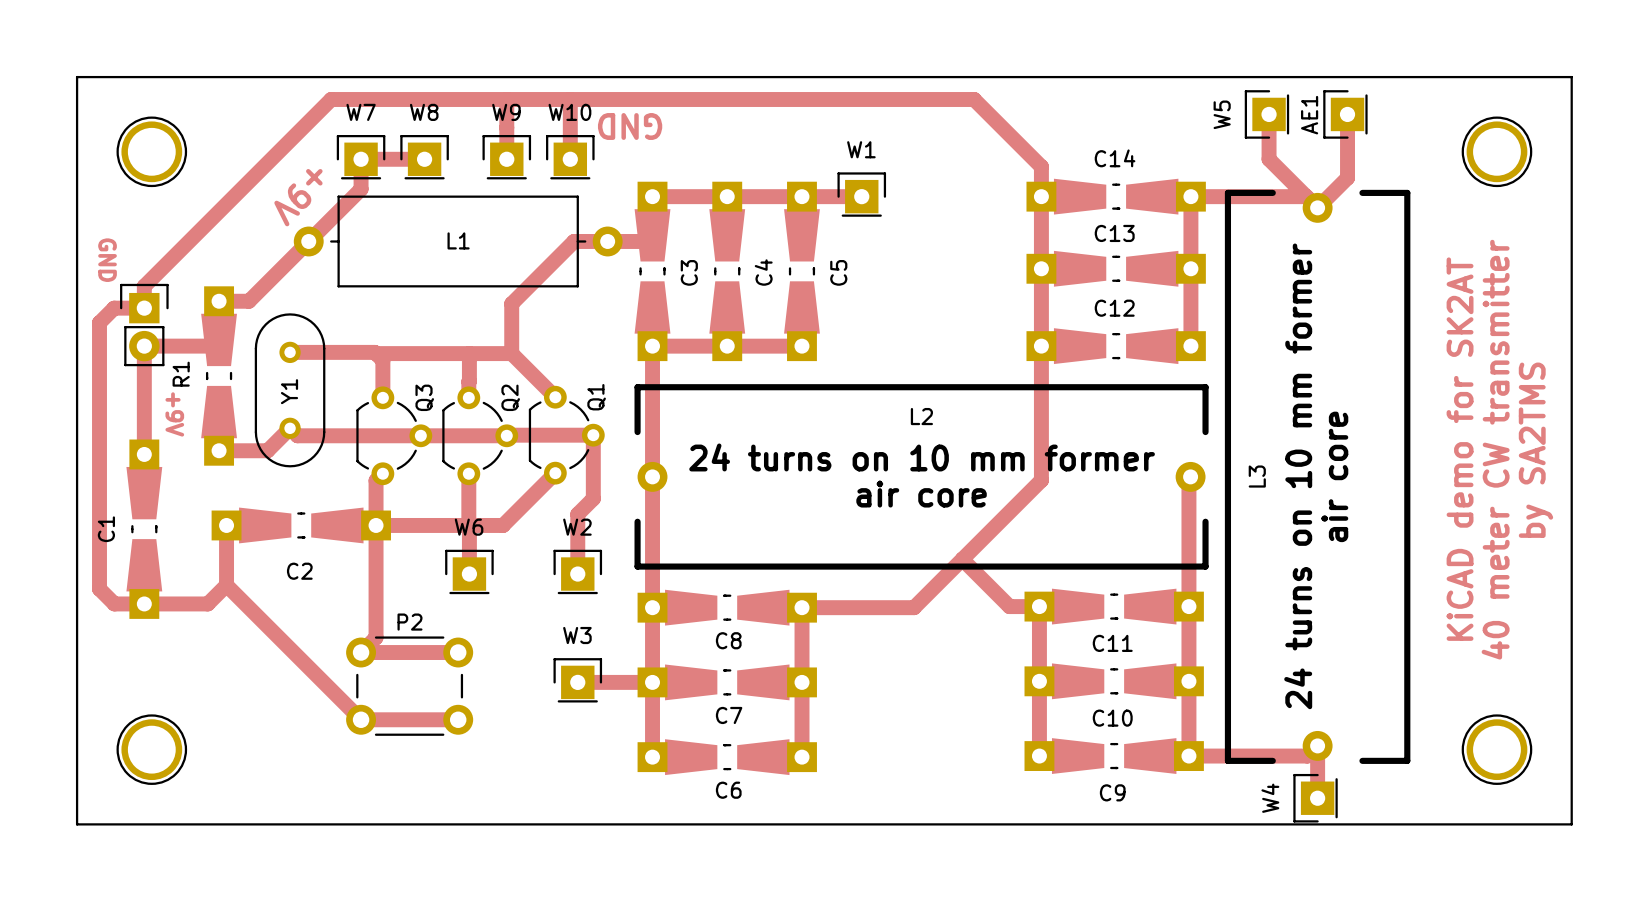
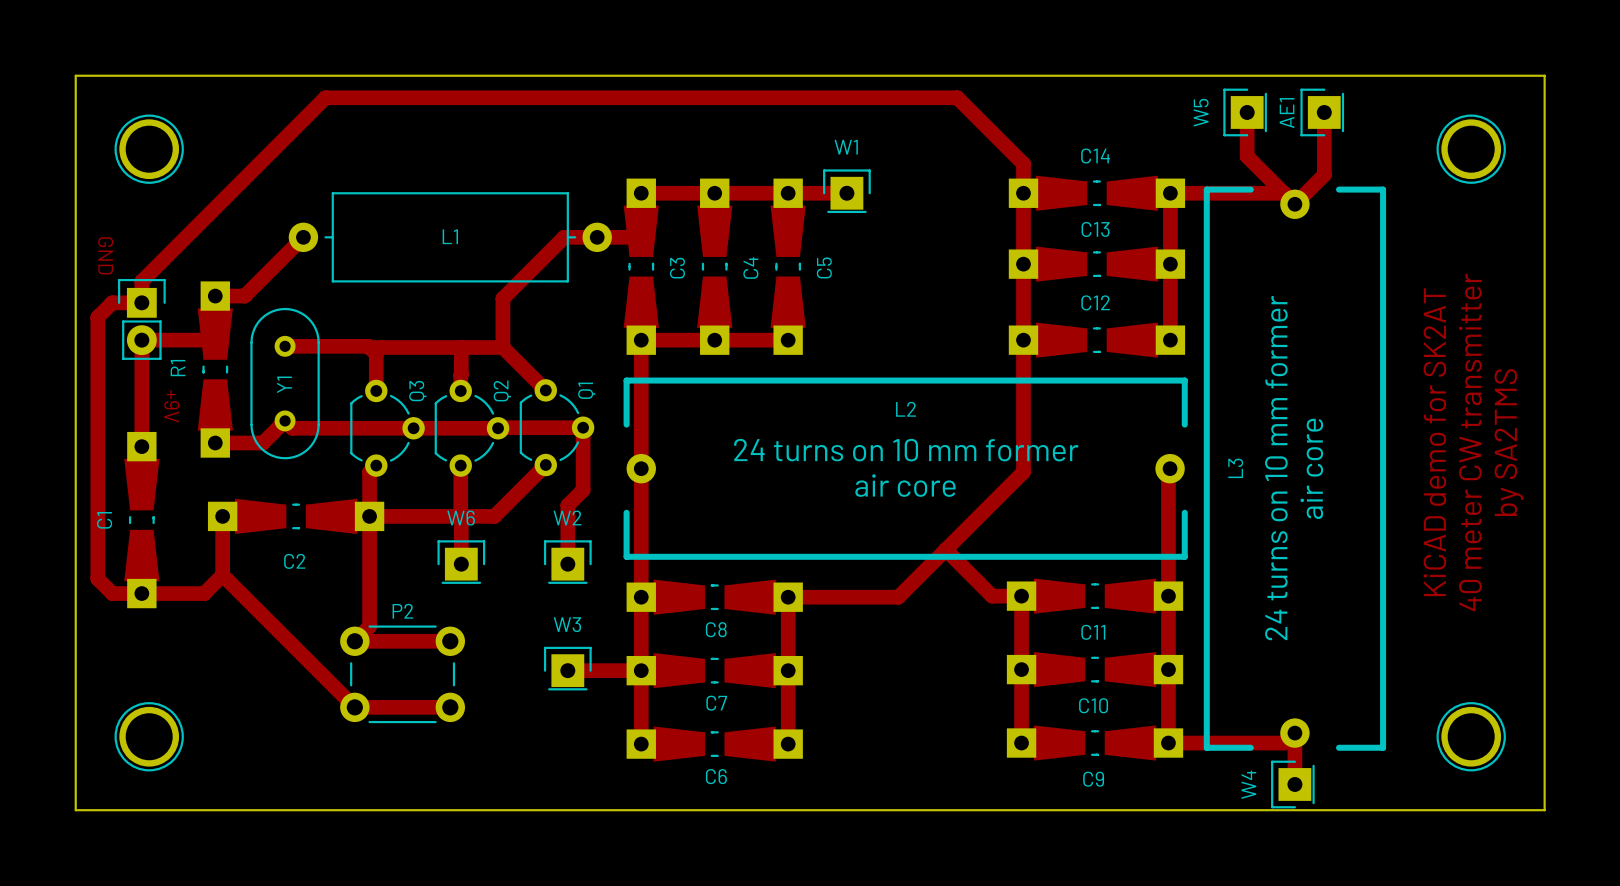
track: (506, 99) (506, 159) -> none
track: (570, 99) (570, 159) -> none
text: GND (630, 126) -> none
W7: (361, 157) -> none
W8: (424, 157) -> none
W9: (506, 157) -> none
W10: (570, 157) -> none
track: (424, 159) (361, 159) (361, 189) (308, 241) -> none
text: +9V (298, 197) -> none

